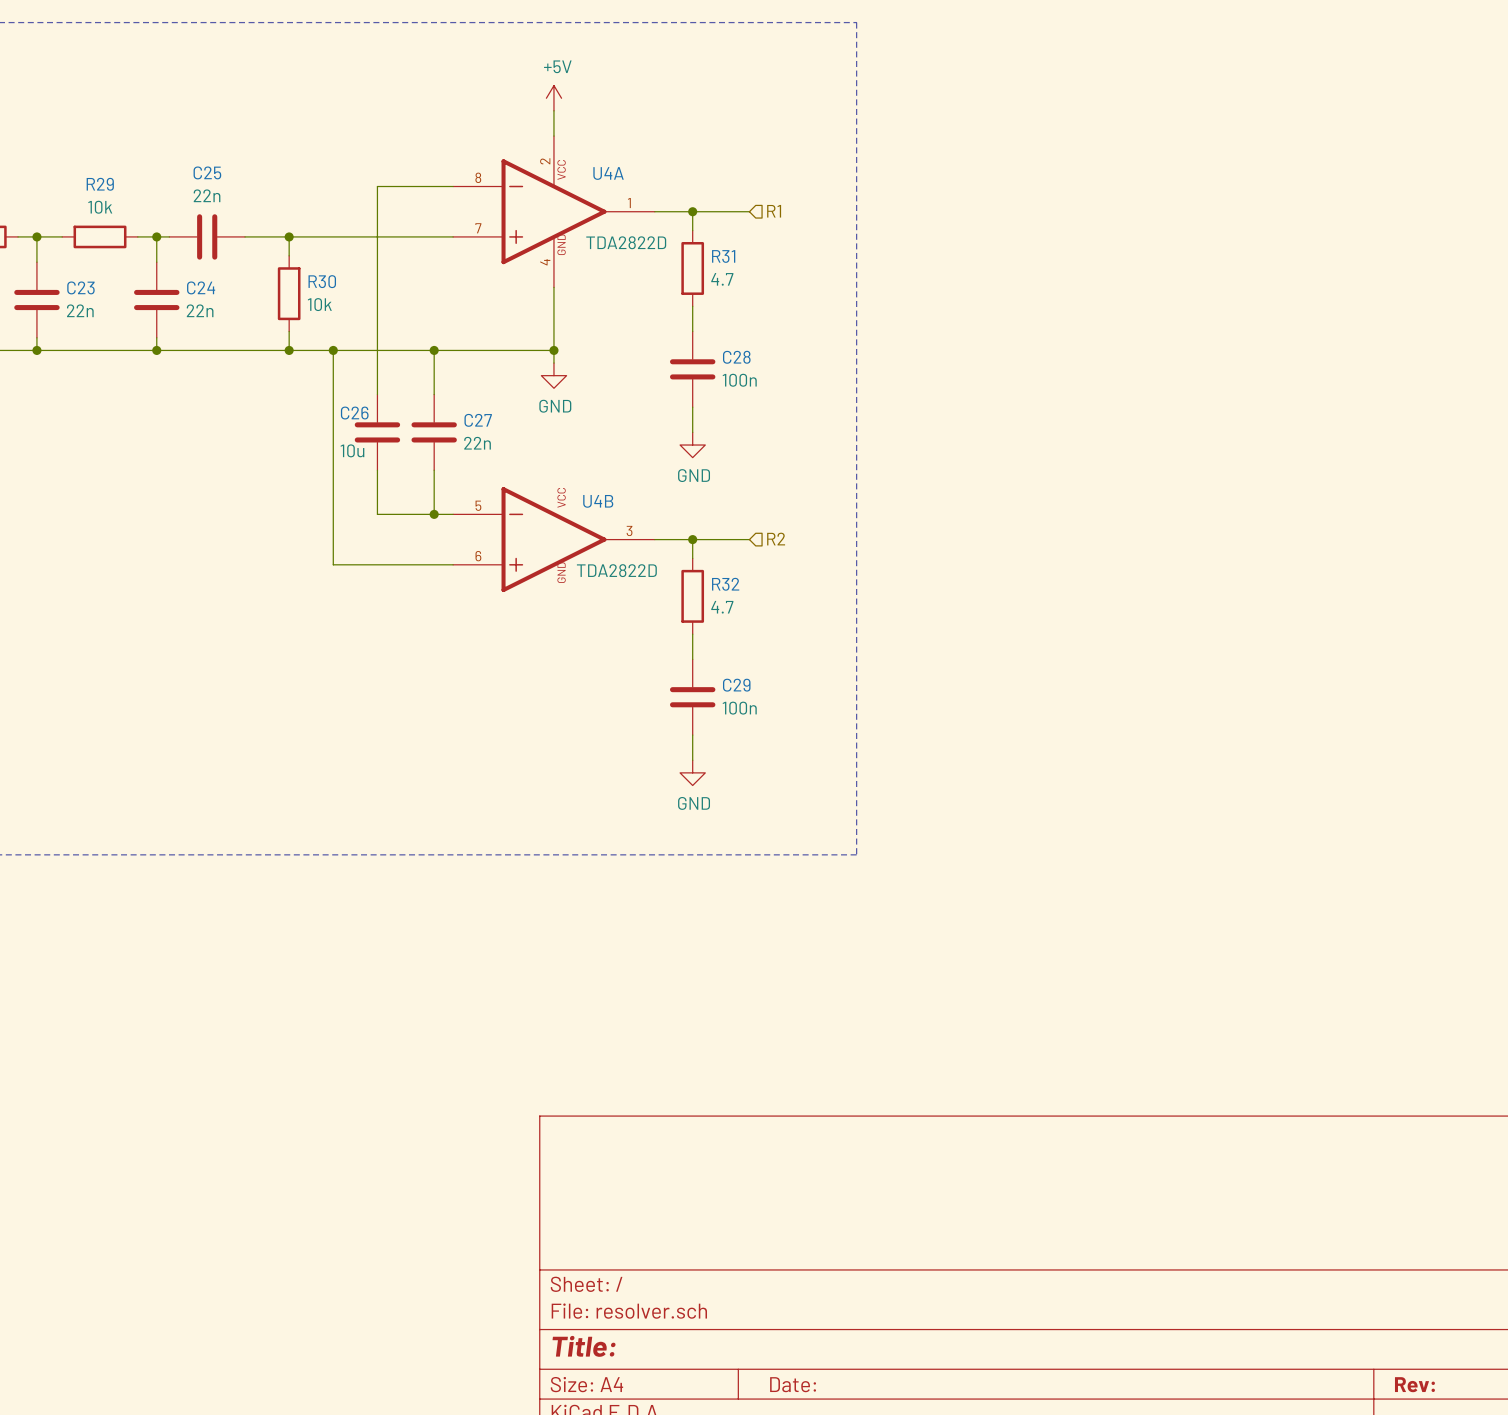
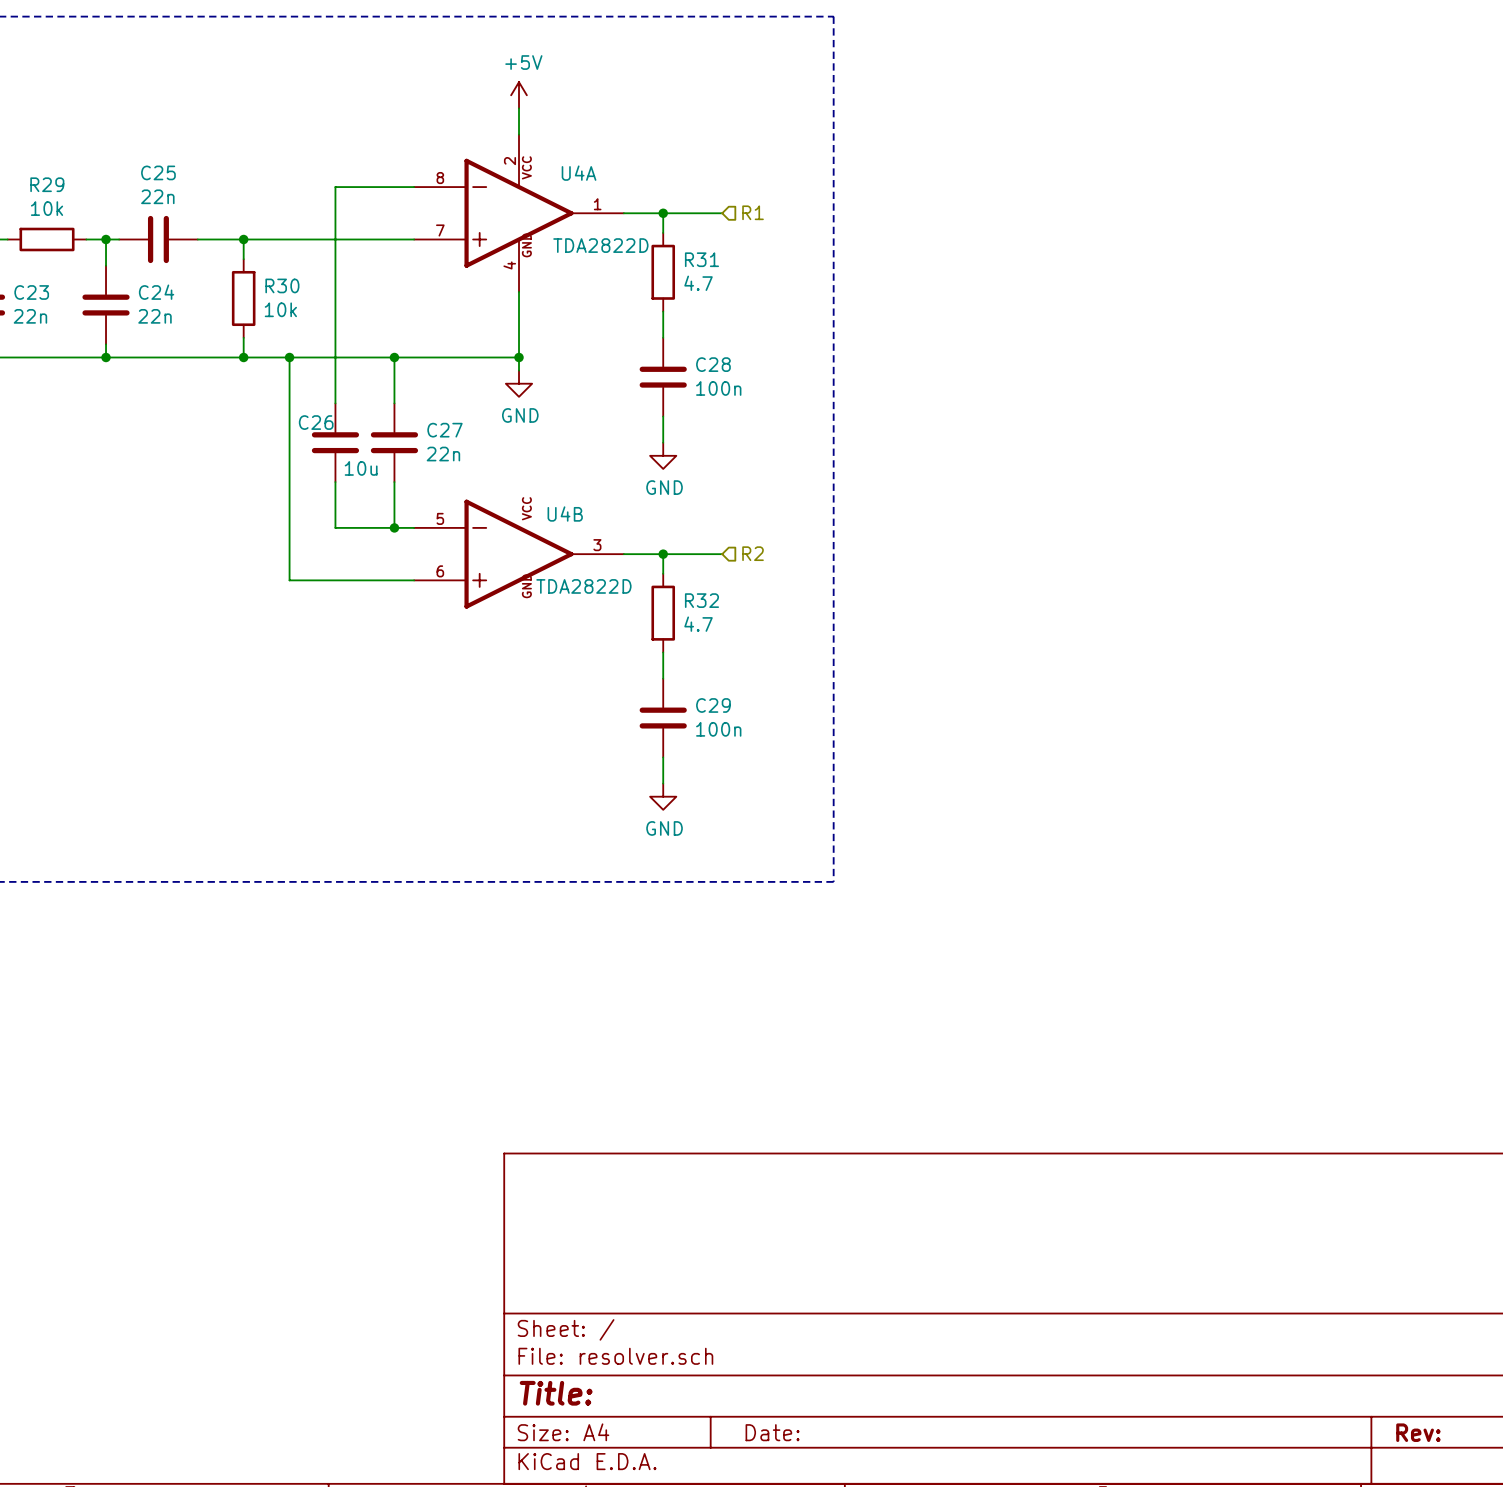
C26 value position: 10u (352, 450) -> 10u (361, 468)

